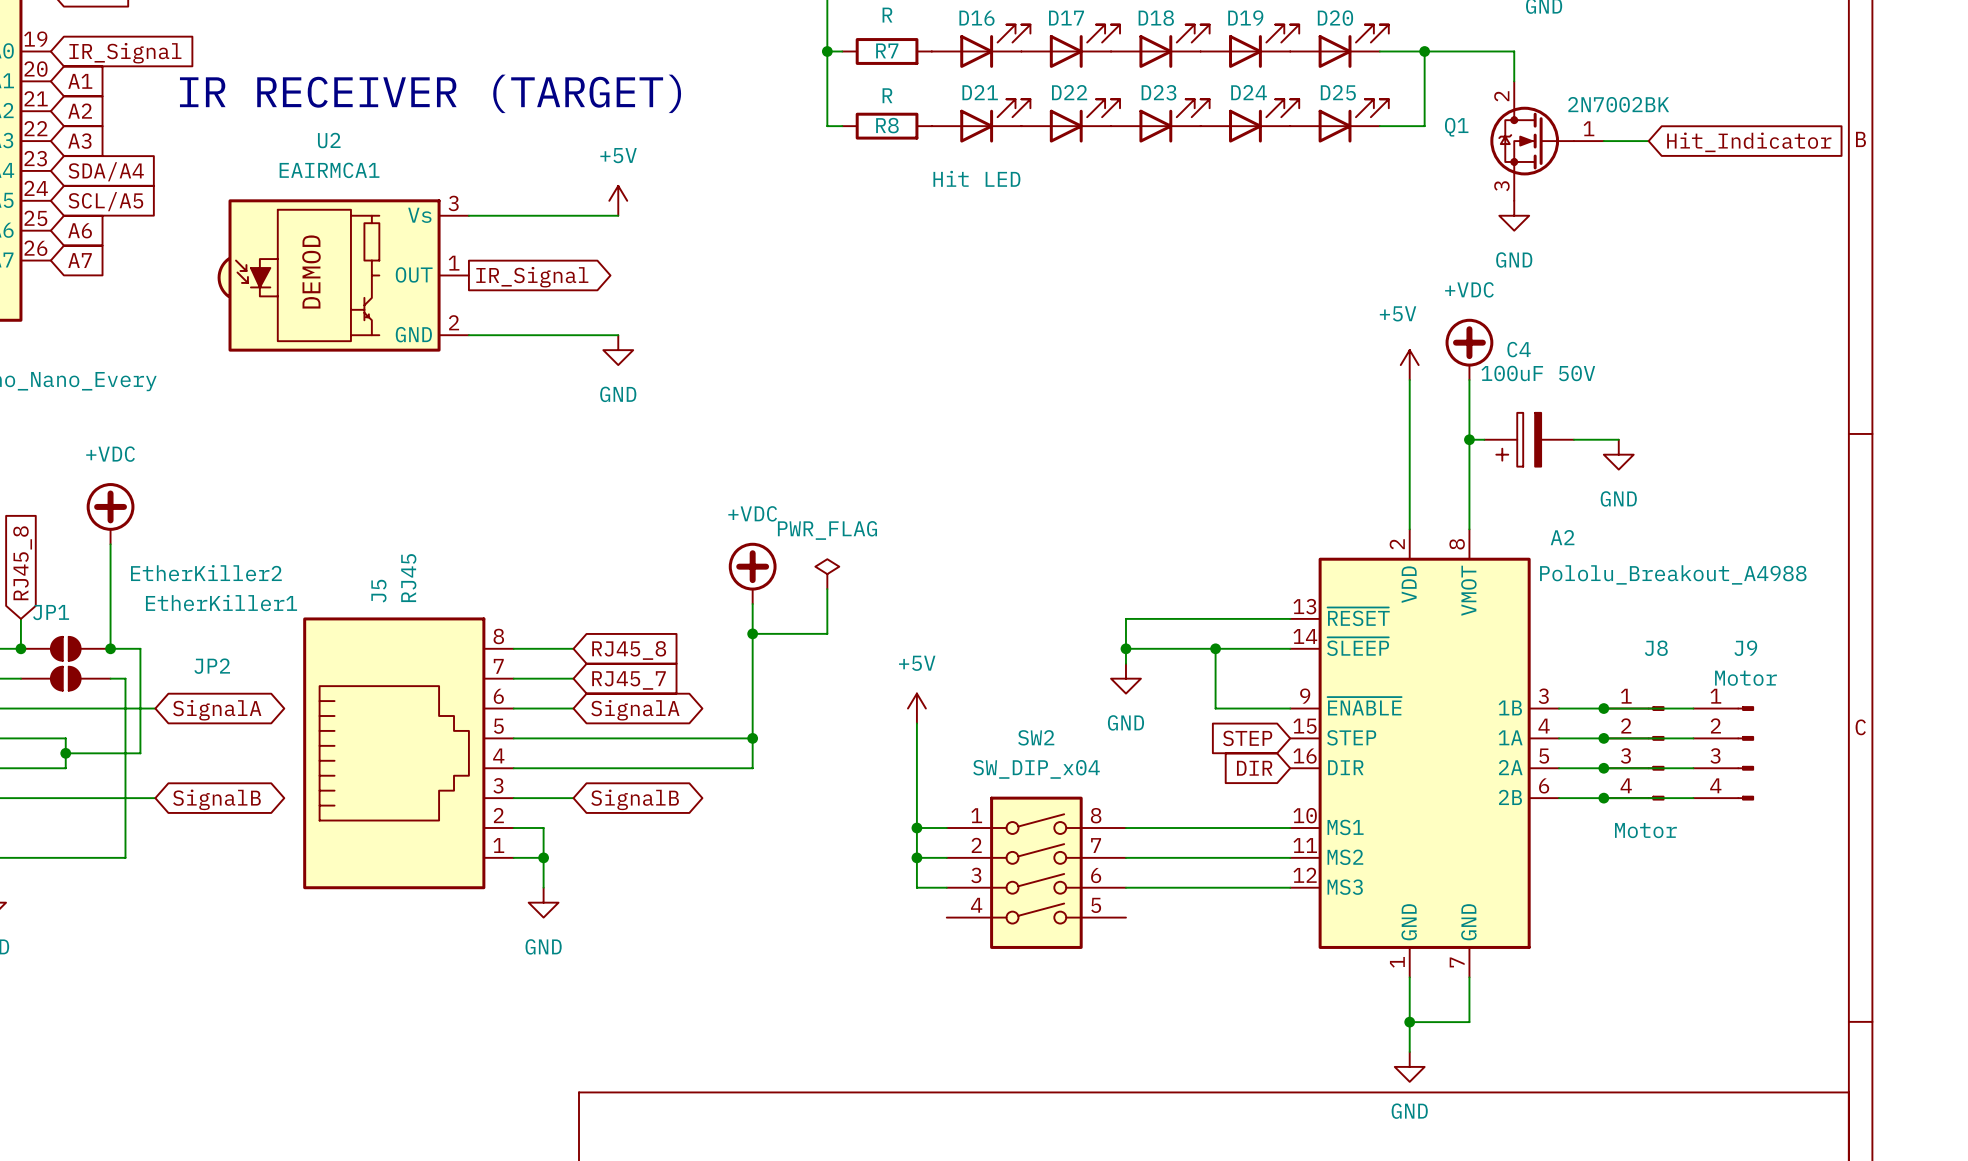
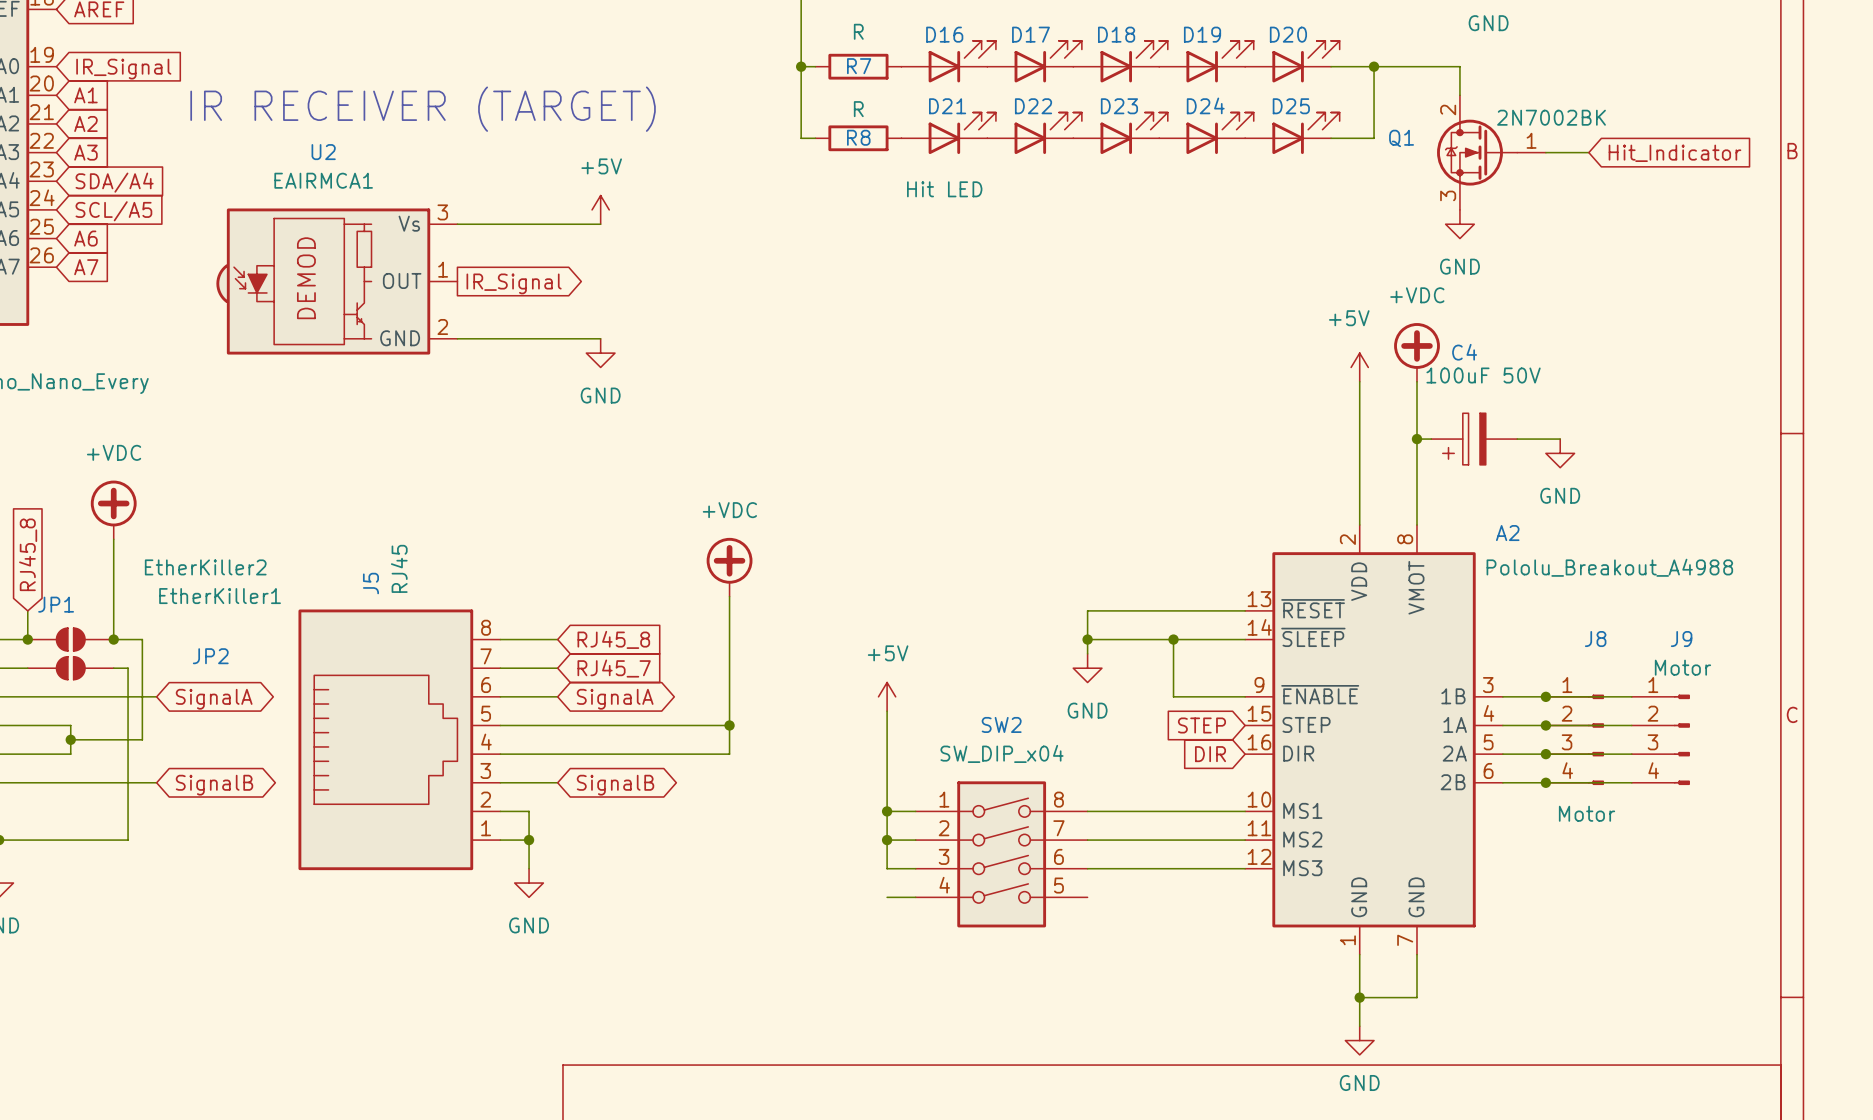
power symbol: PWR_FLAG (827, 574) -> none
wire: (827, 589) (827, 633) (752, 633) -> none
junction: (752, 633) -> none
wire: none -> (887, 897) (915, 897)

